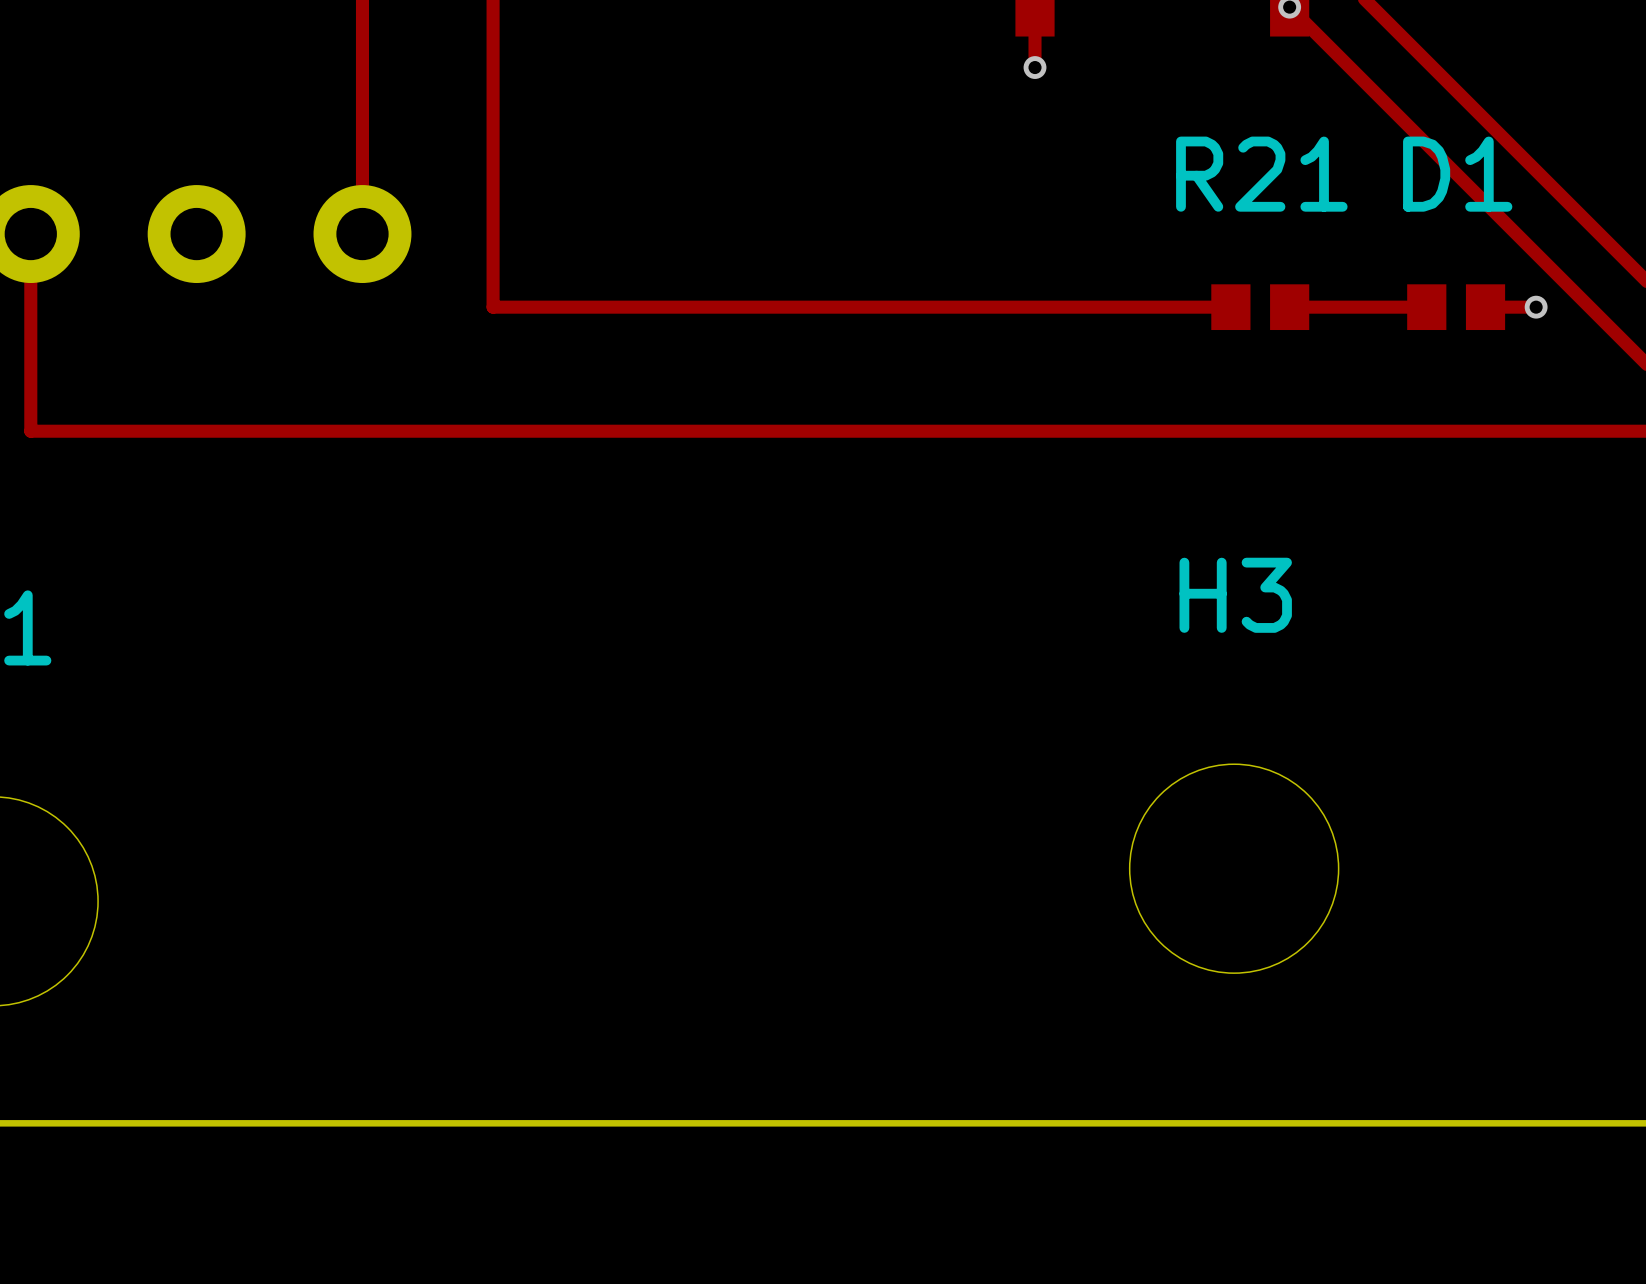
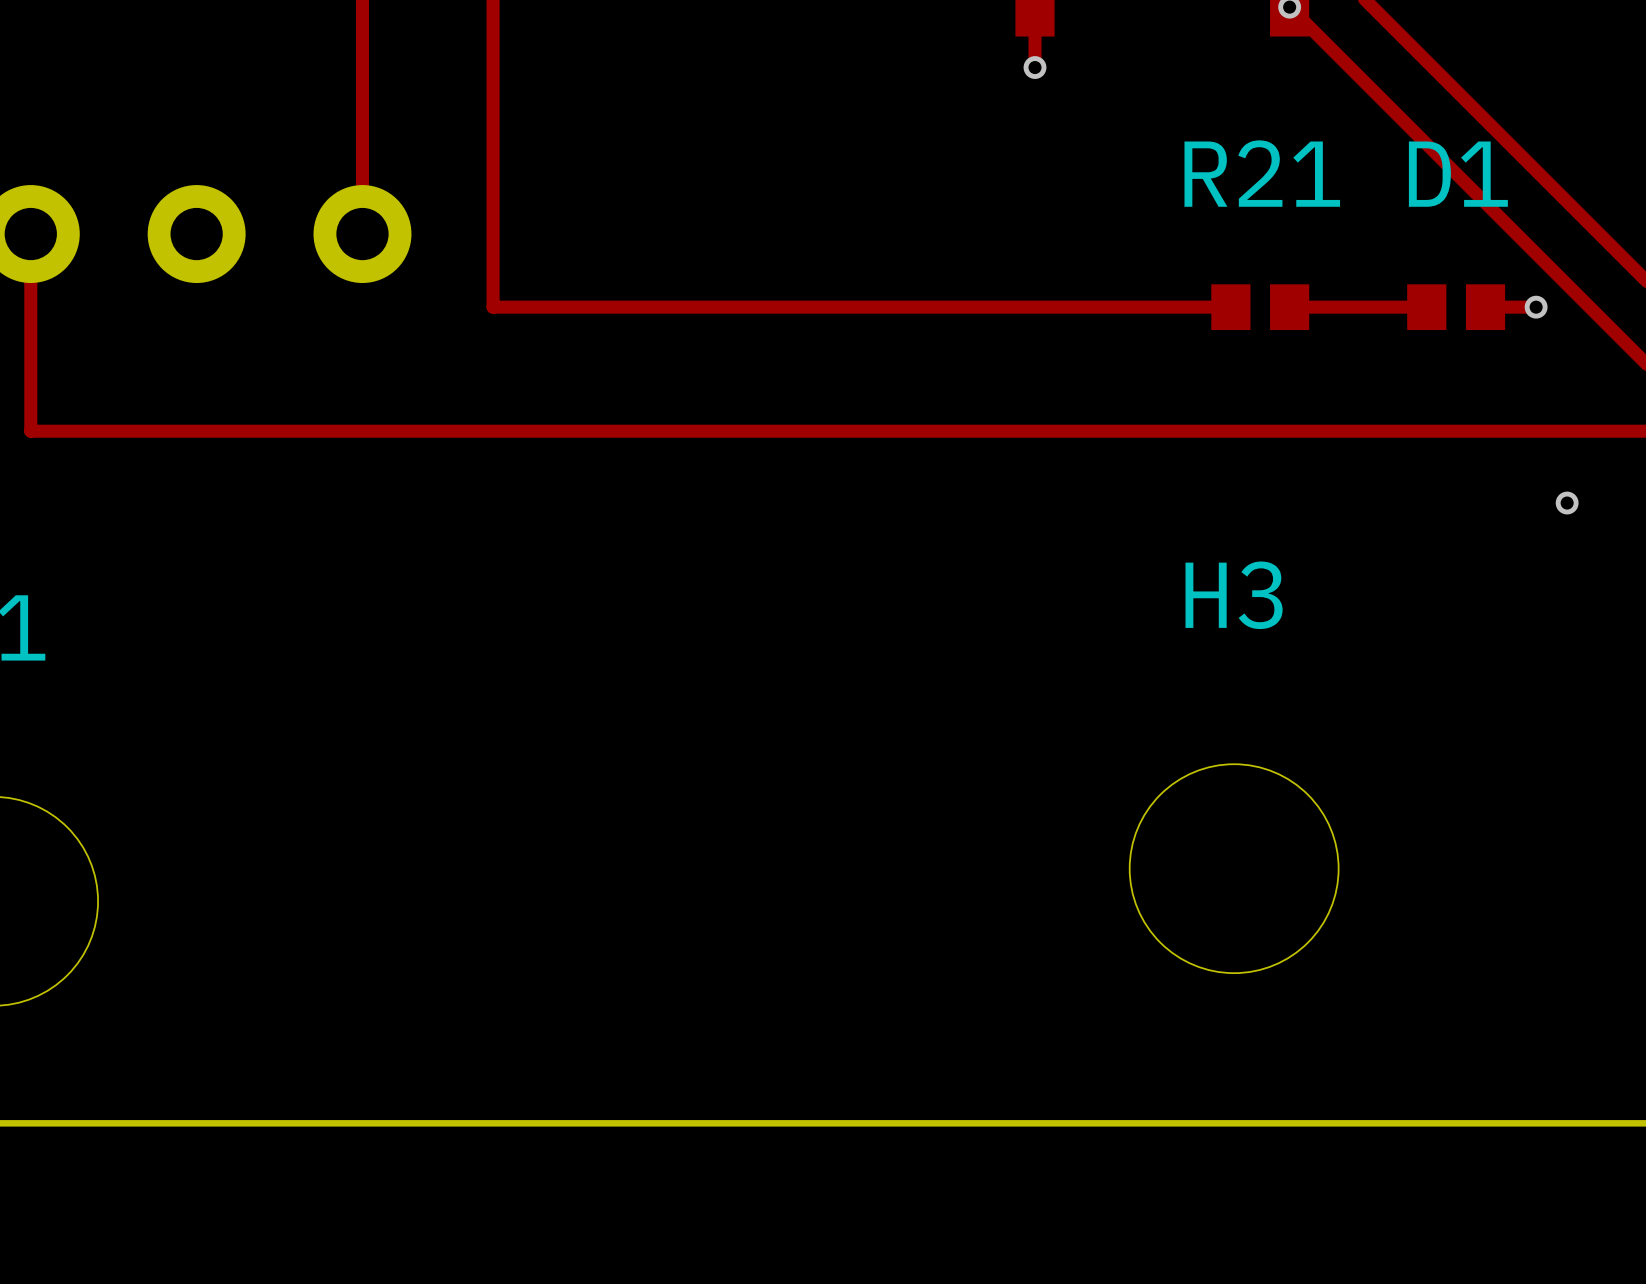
via: none -> (1567, 503)

